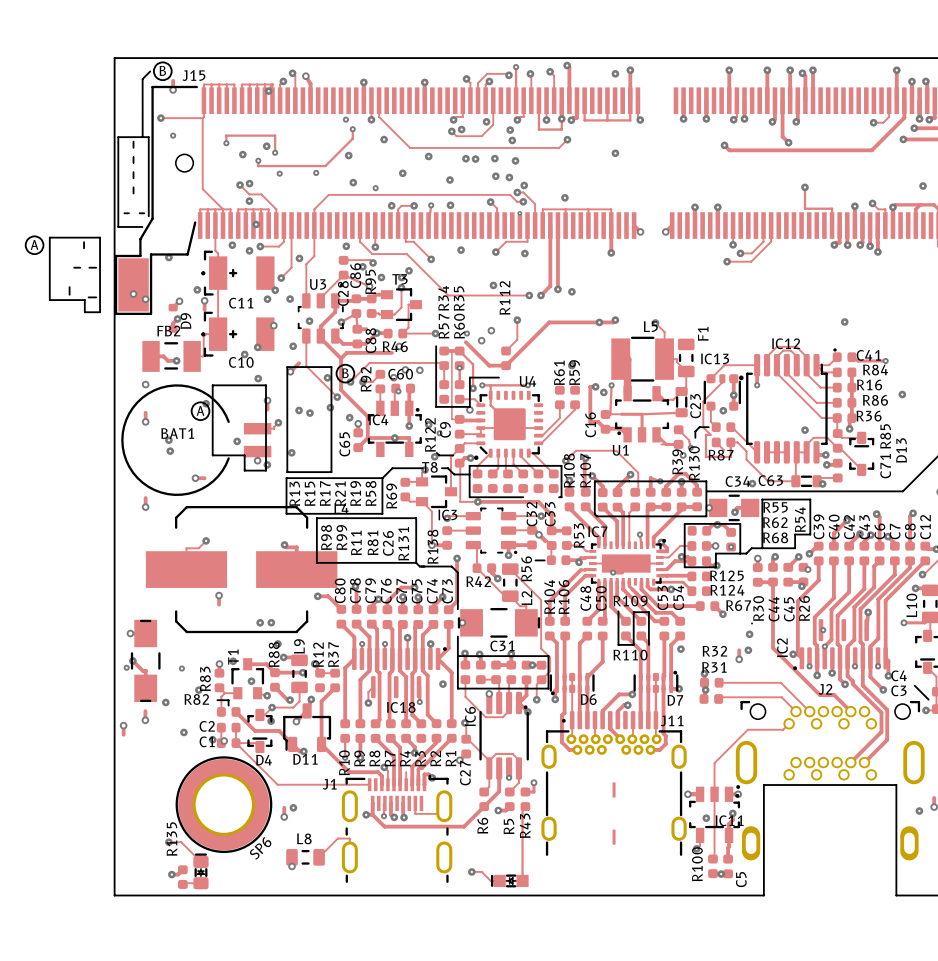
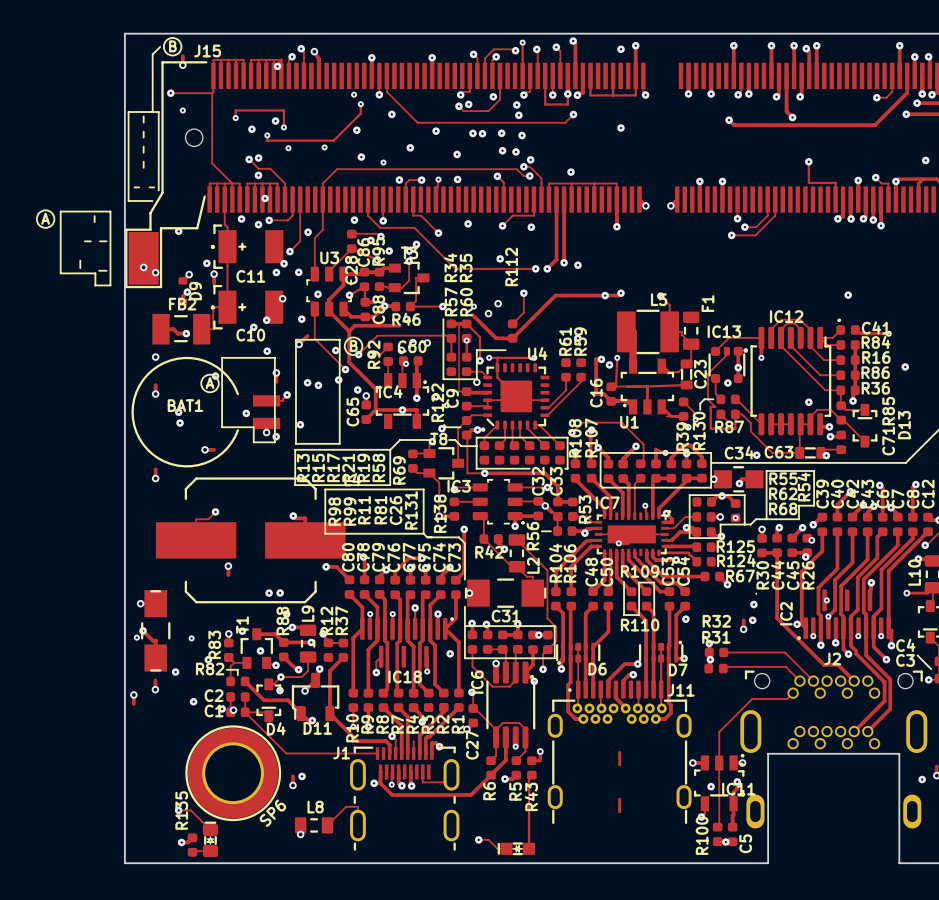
via: (519, 213) -> none

